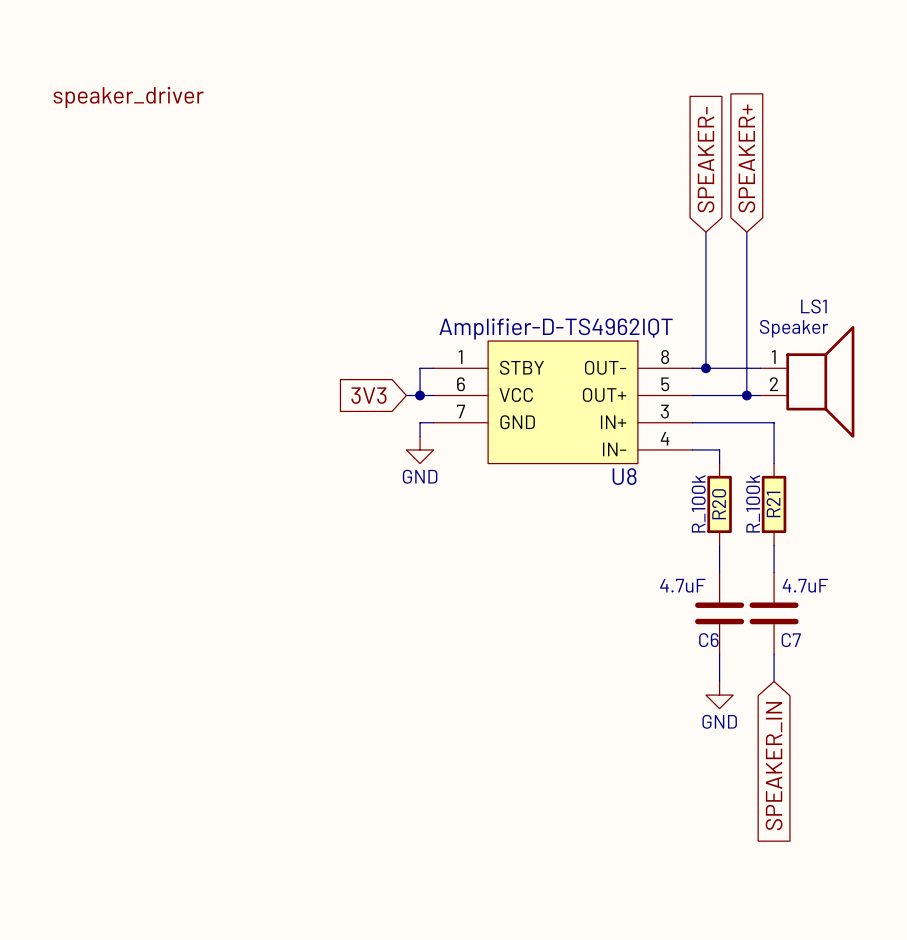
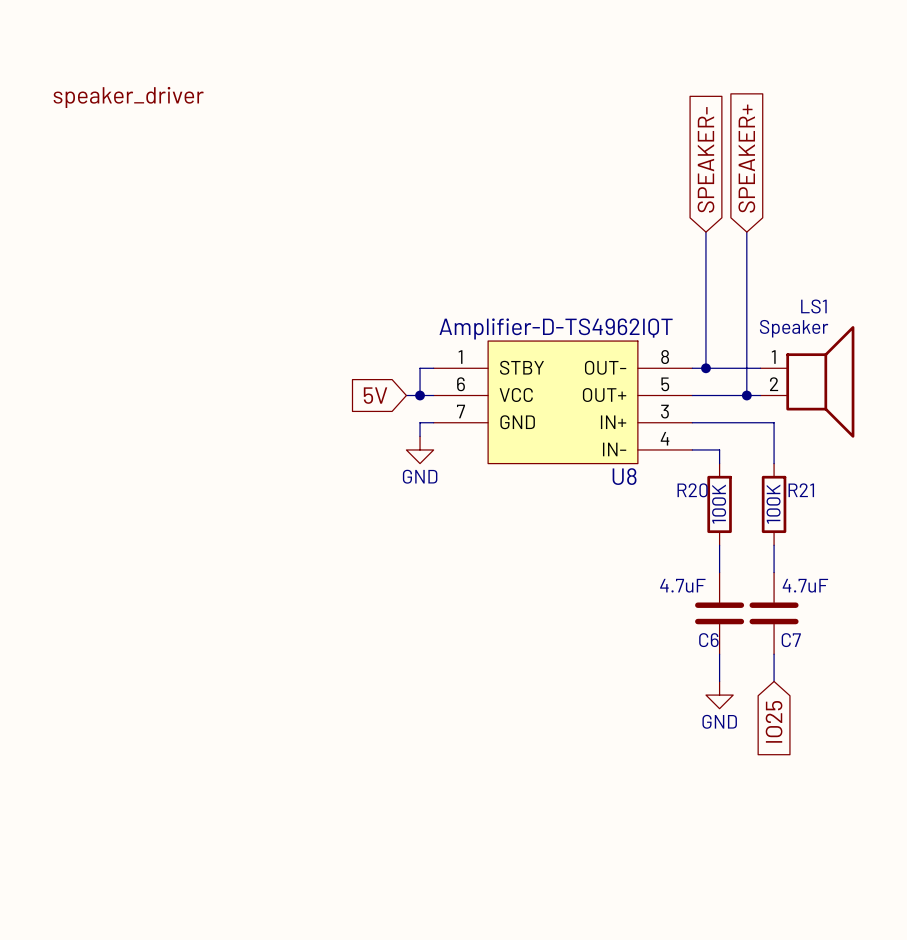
global label: 3V3 (368, 395) -> 5V (375, 395)
R20 symbol: [707, 463, 732, 546] -> [707, 463, 732, 546]
R21 symbol: [761, 463, 787, 546] -> [761, 463, 787, 546]
R20 value: R_100k (698, 503) -> 100K (719, 504)
R21 value: R_100k (753, 503) -> 100K (773, 504)
R20 name position: R20 (719, 504) -> R20 (692, 490)
R21 name position: R21 (773, 504) -> R21 (801, 490)
global label: SPEAKER_IN (774, 766) -> IO25 (774, 721)

